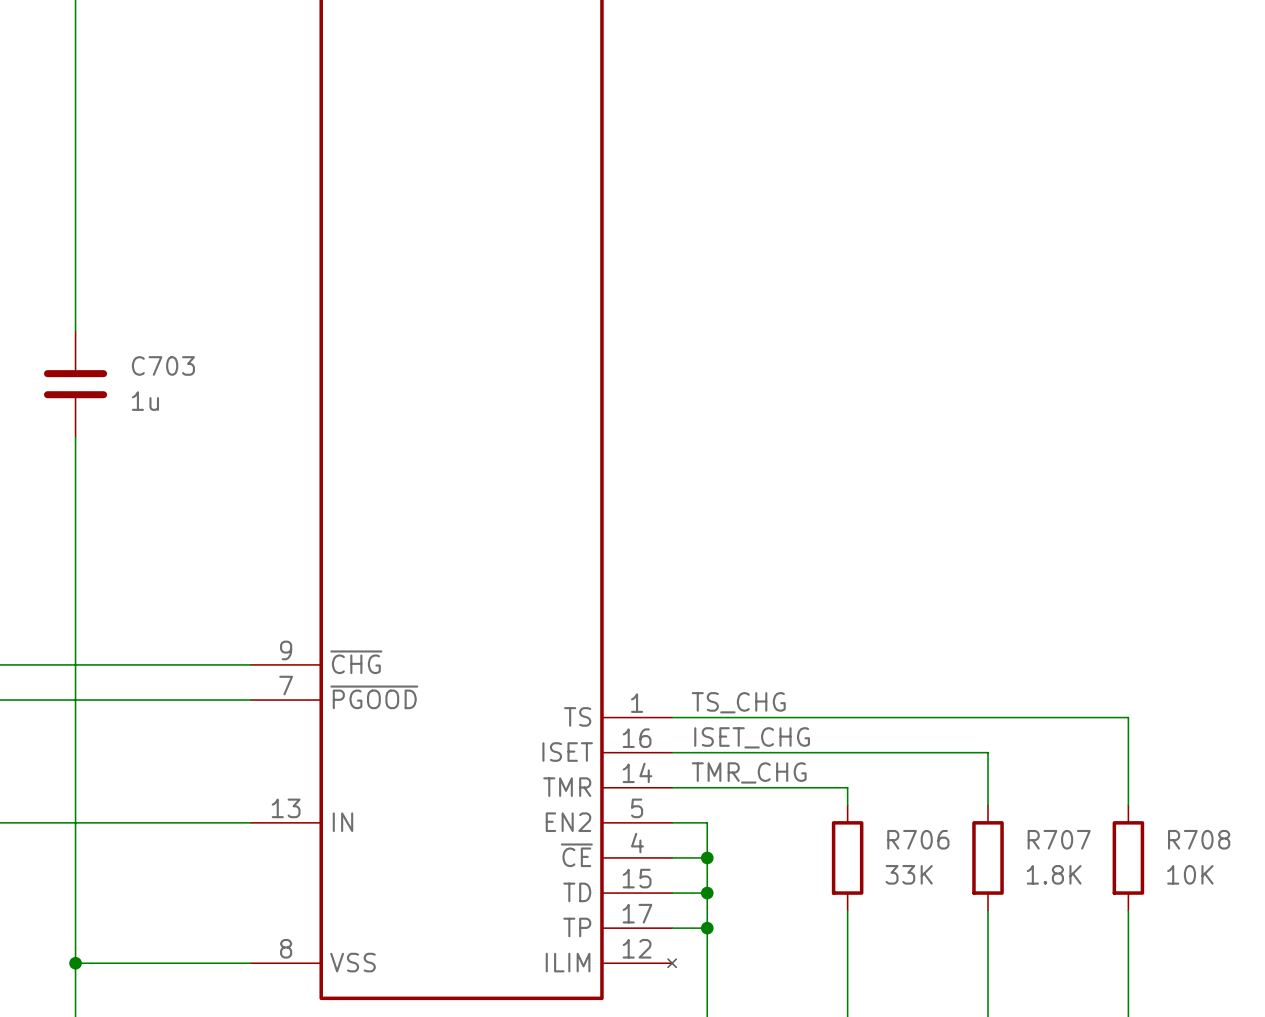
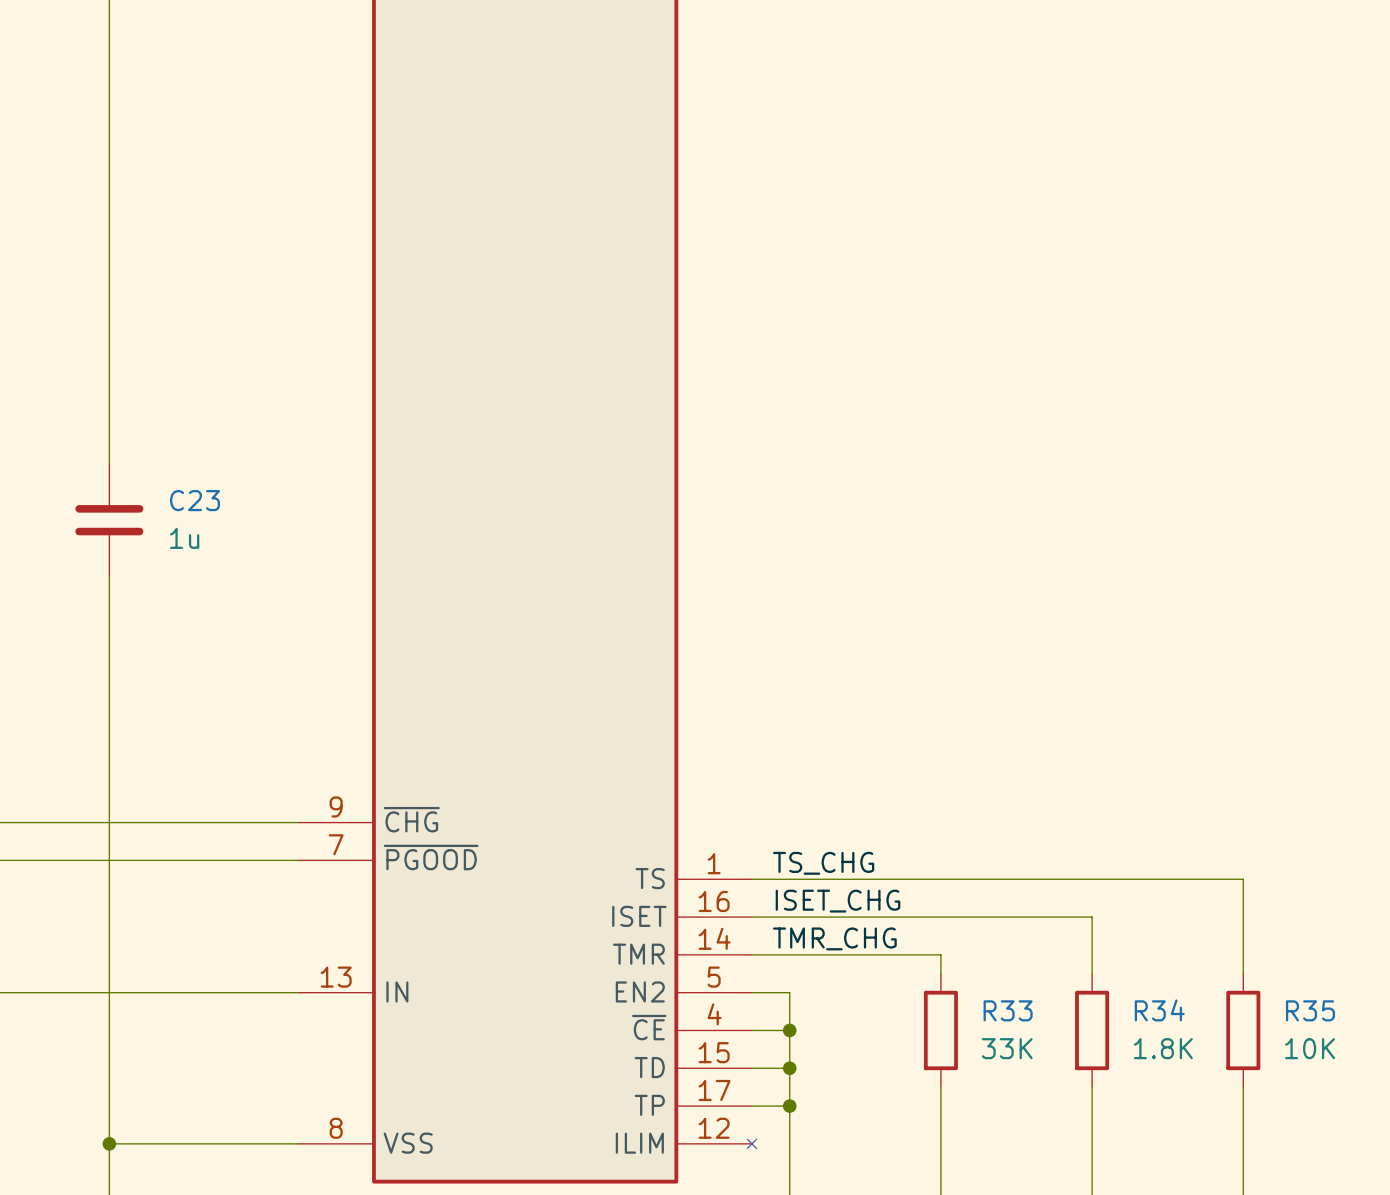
C703 name: C703 (163, 365) -> C23 (195, 500)
R706 name: R706 (918, 839) -> R33 (1008, 1010)
R707 name: R707 (1059, 839) -> R34 (1159, 1010)
R708 name: R708 (1199, 839) -> R35 (1310, 1010)

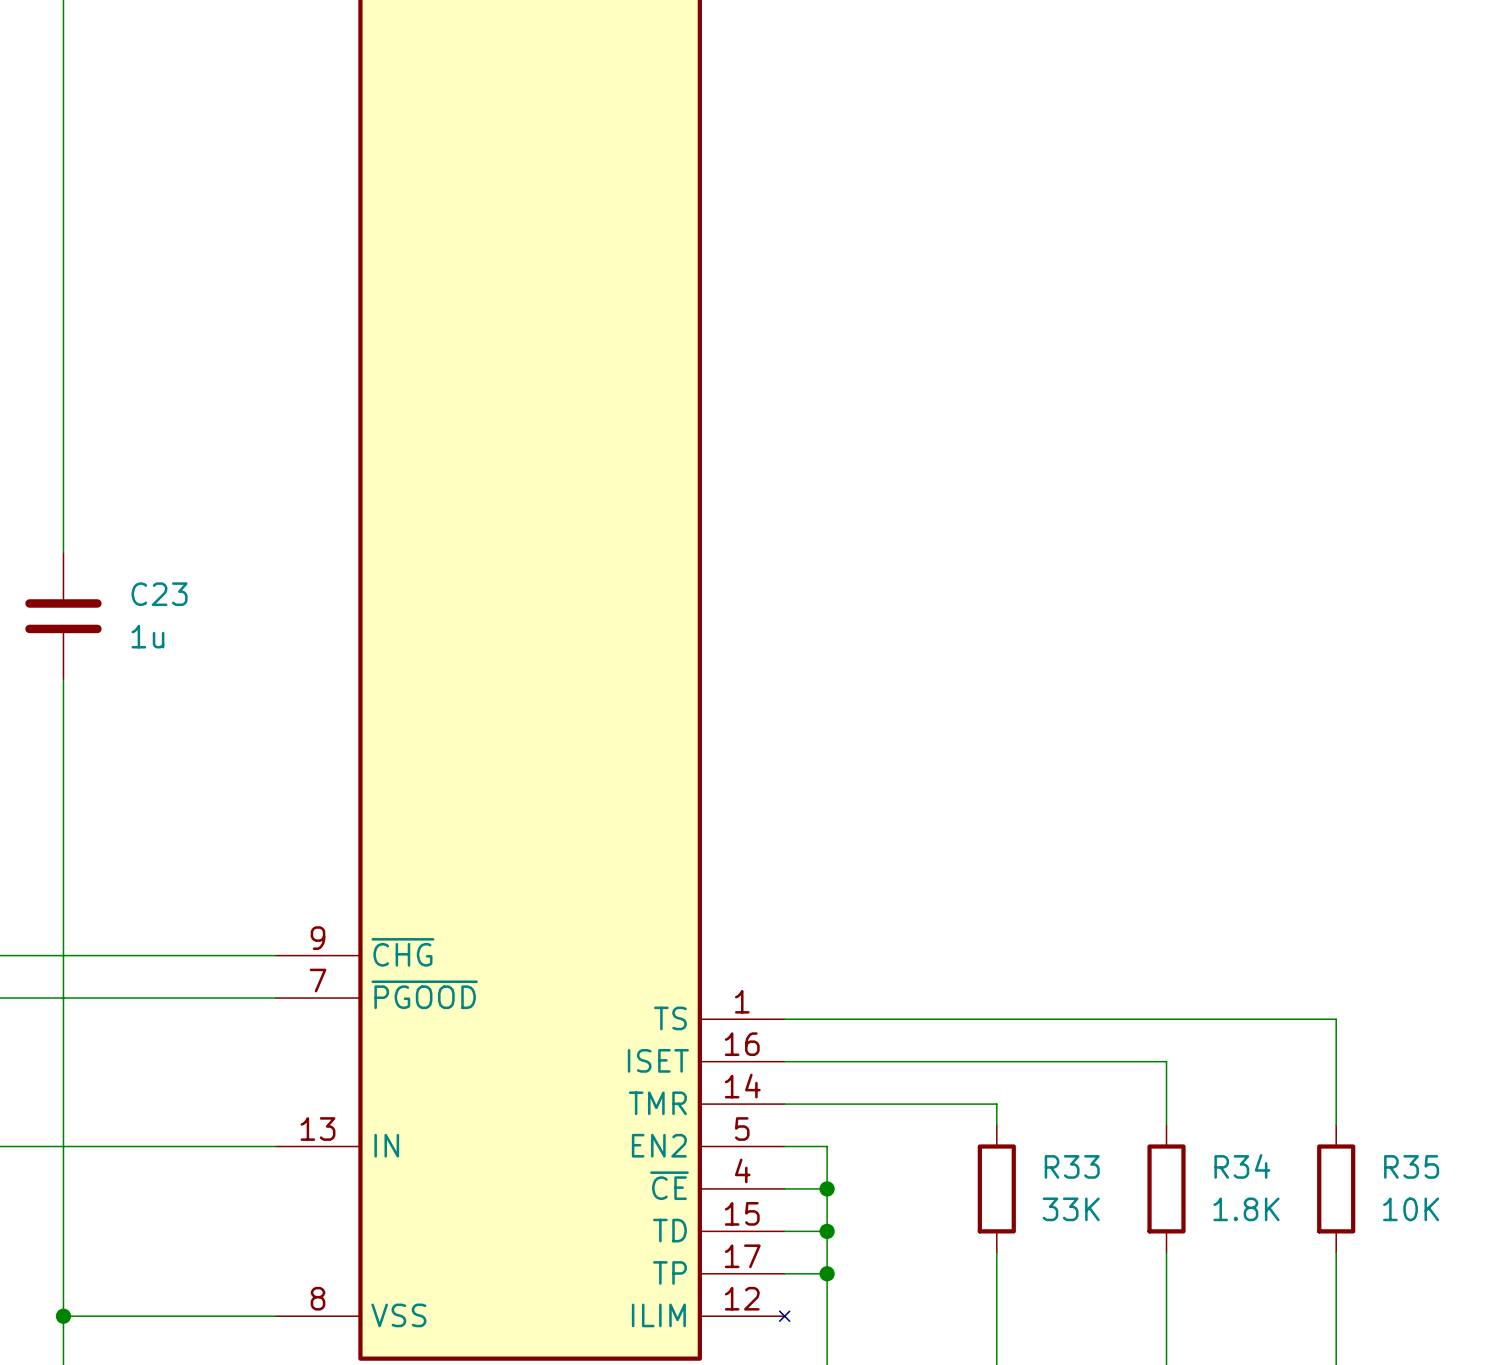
label: TS_CHG (823, 863) -> none
label: ISET_CHG (838, 901) -> none
label: TMR_CHG (834, 938) -> none

